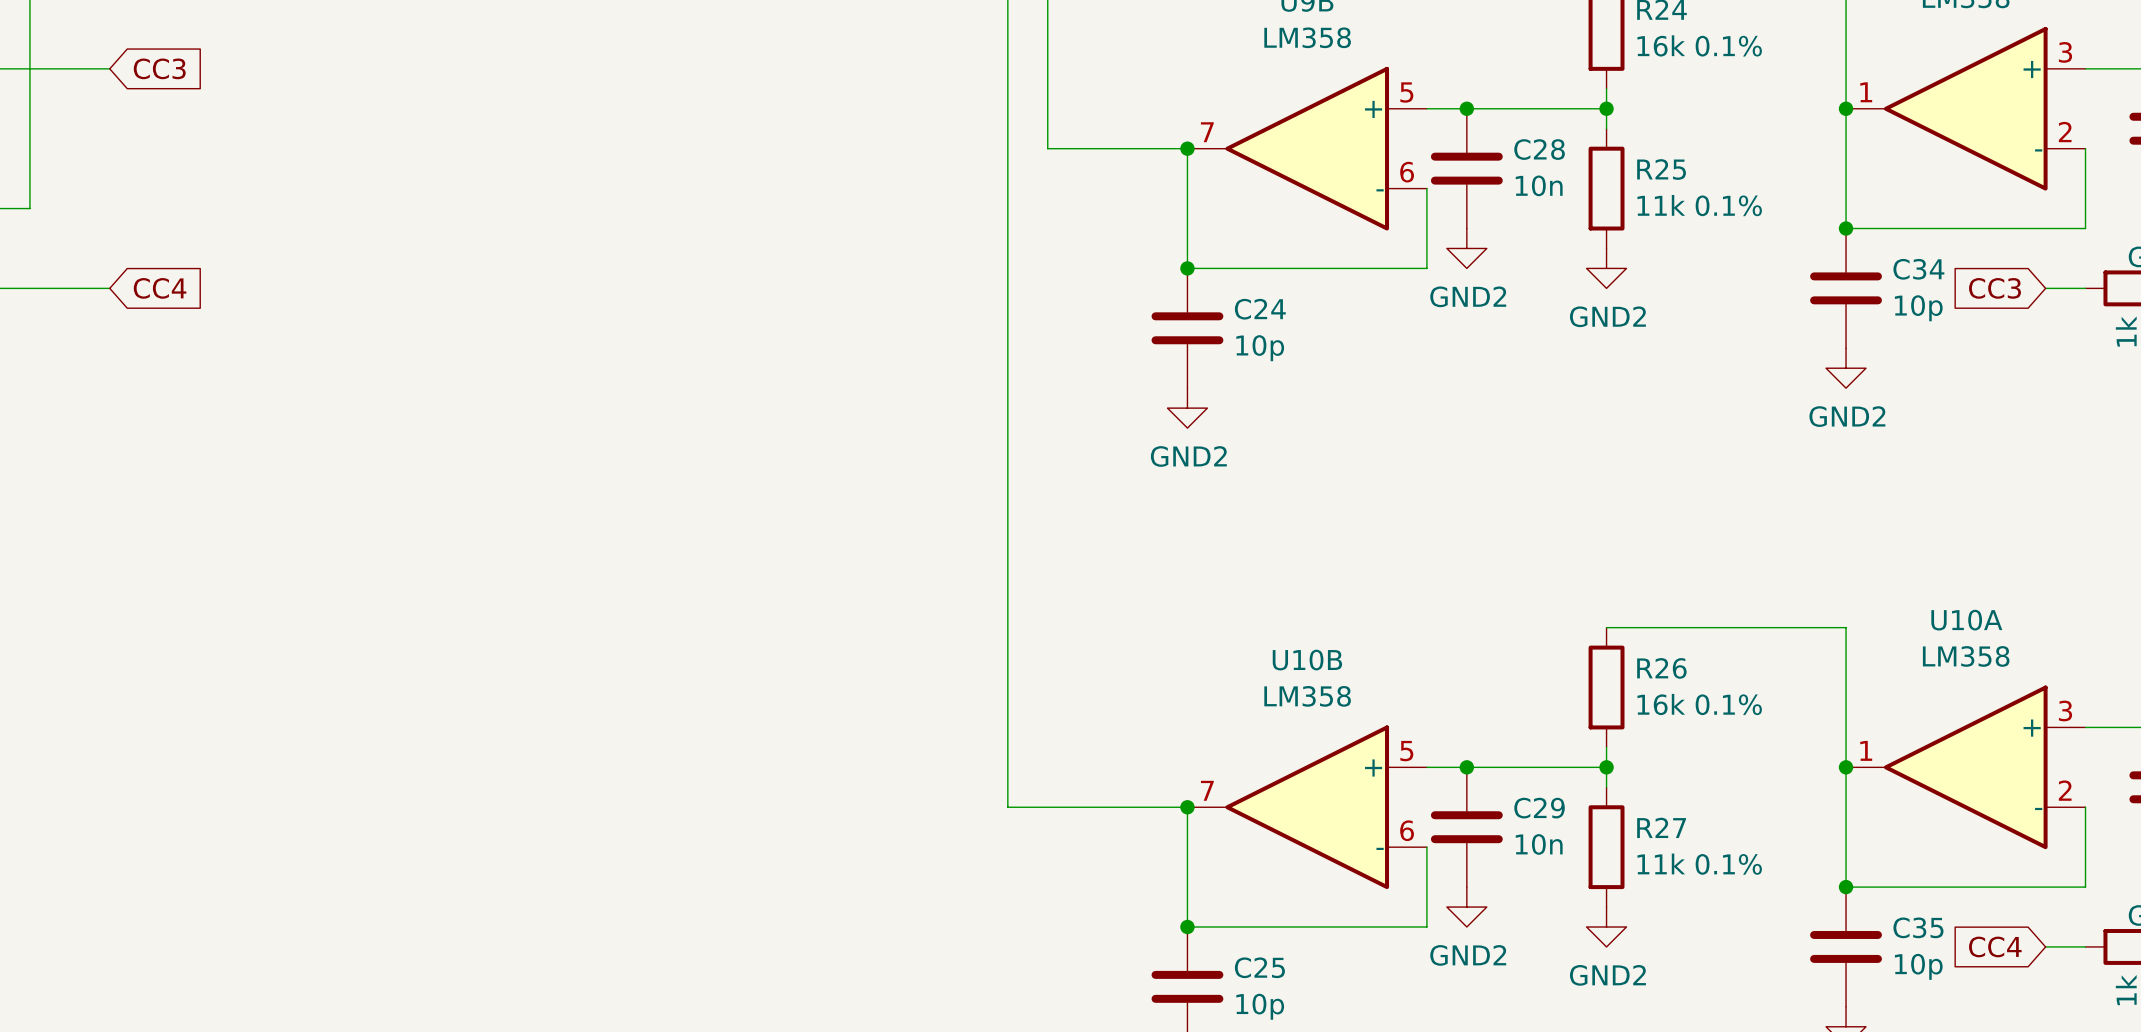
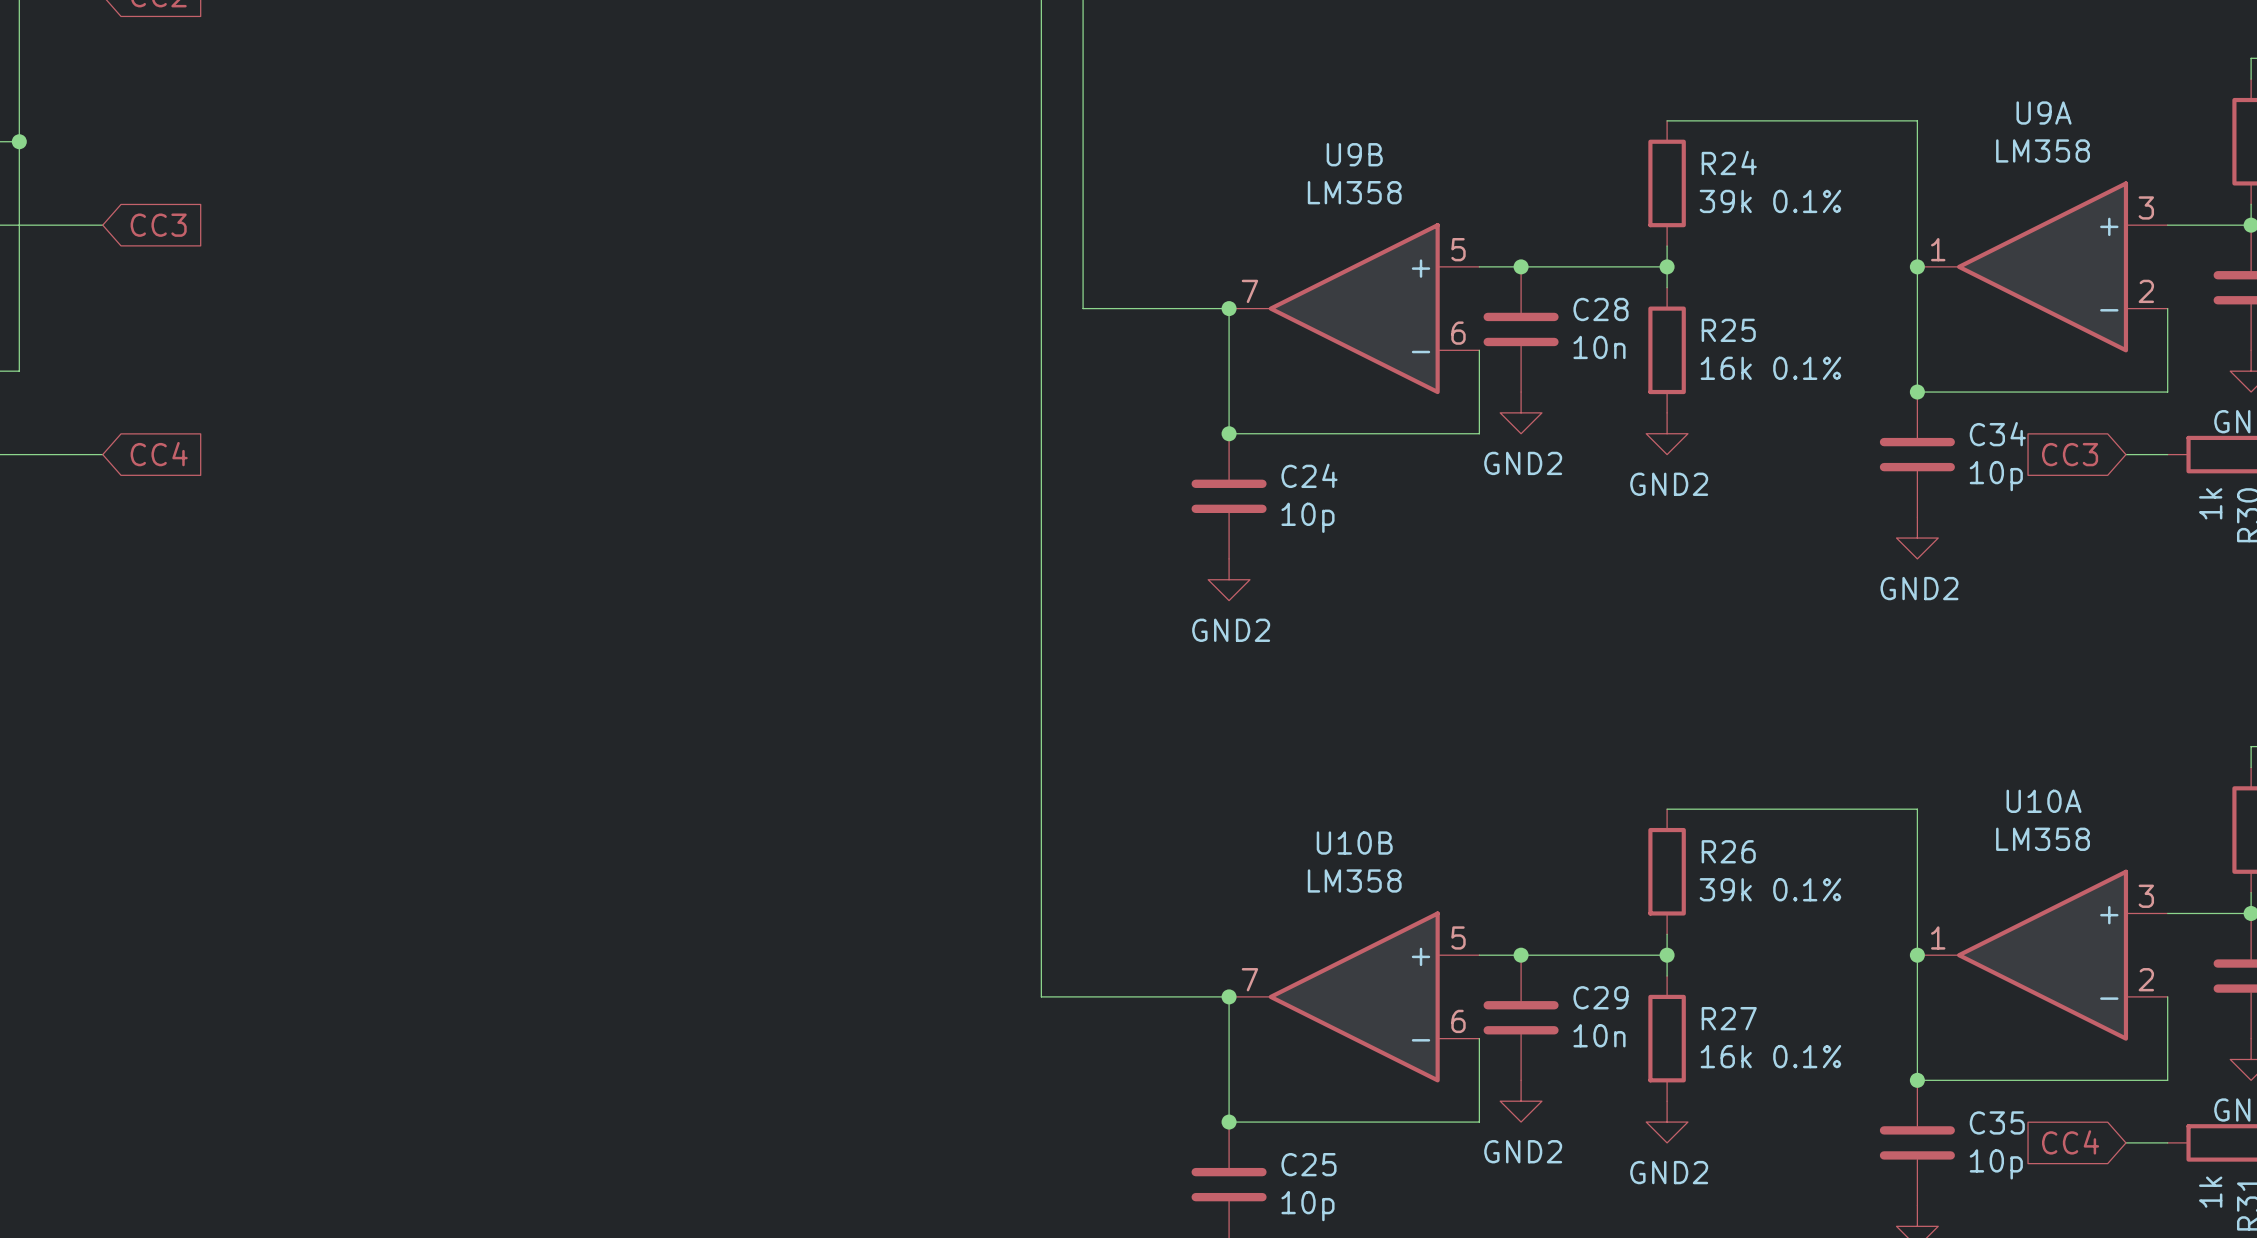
R24 value: 16k 0.1% (1699, 45) -> 39k 0.1% (1770, 201)
R25 value: 11k 0.1% (1699, 205) -> 16k 0.1% (1770, 368)
R26 value: 16k 0.1% (1699, 704) -> 39k 0.1% (1770, 889)
R27 value: 11k 0.1% (1699, 864) -> 16k 0.1% (1770, 1056)

